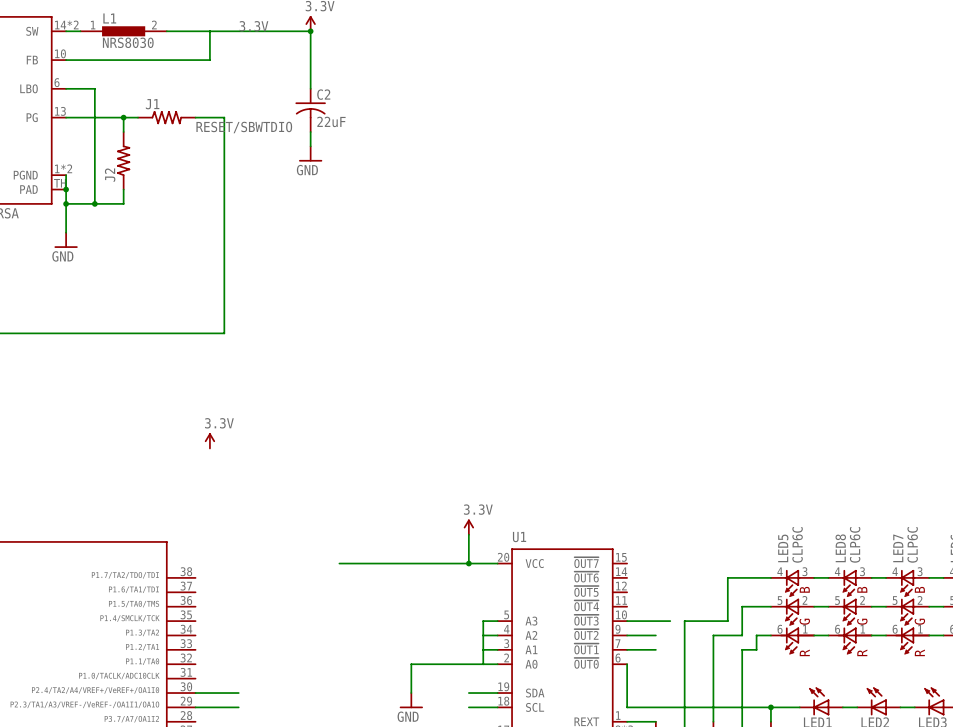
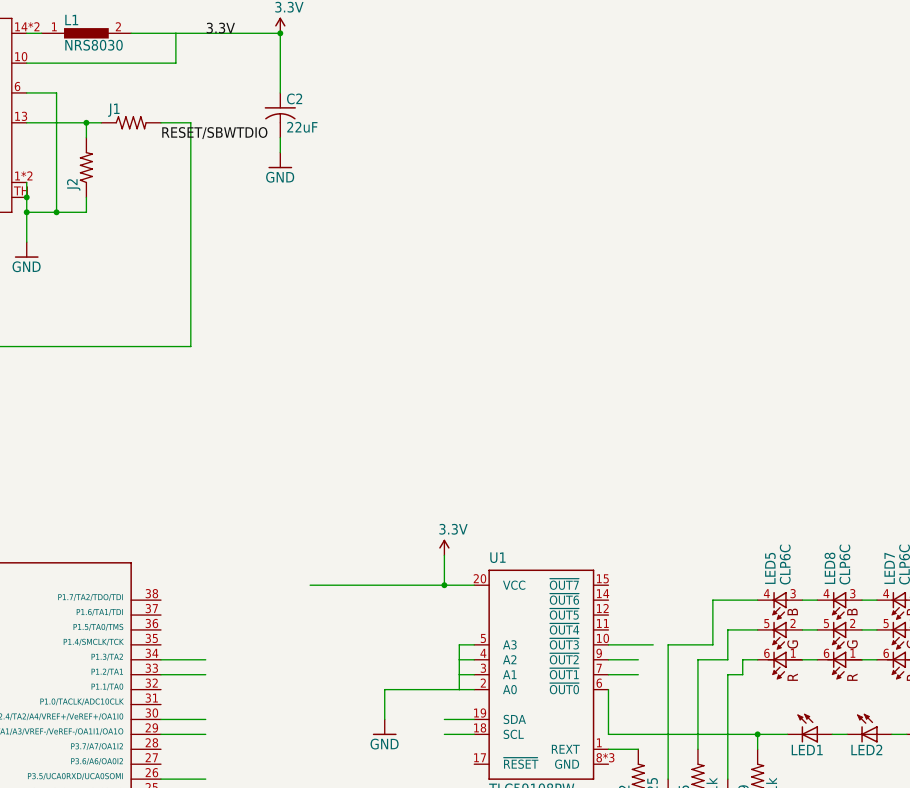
power symbol: 3.3V (209, 440) -> none
wire: none -> (160, 659) (205, 659)
wire: none -> (160, 674) (205, 674)

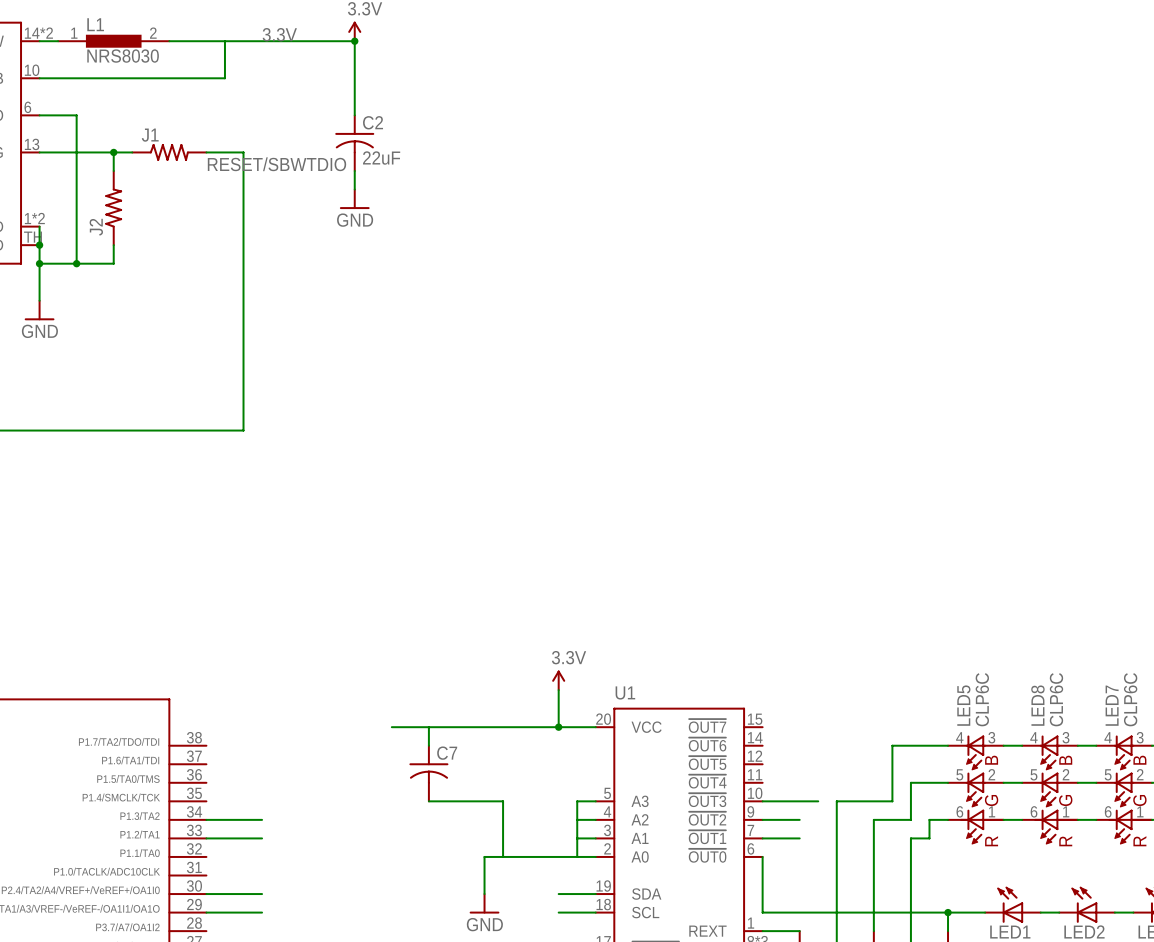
wire: none -> (428, 727) (428, 745)
C7: none -> (428, 773)
wire: none -> (428, 801) (503, 801) (503, 856)

